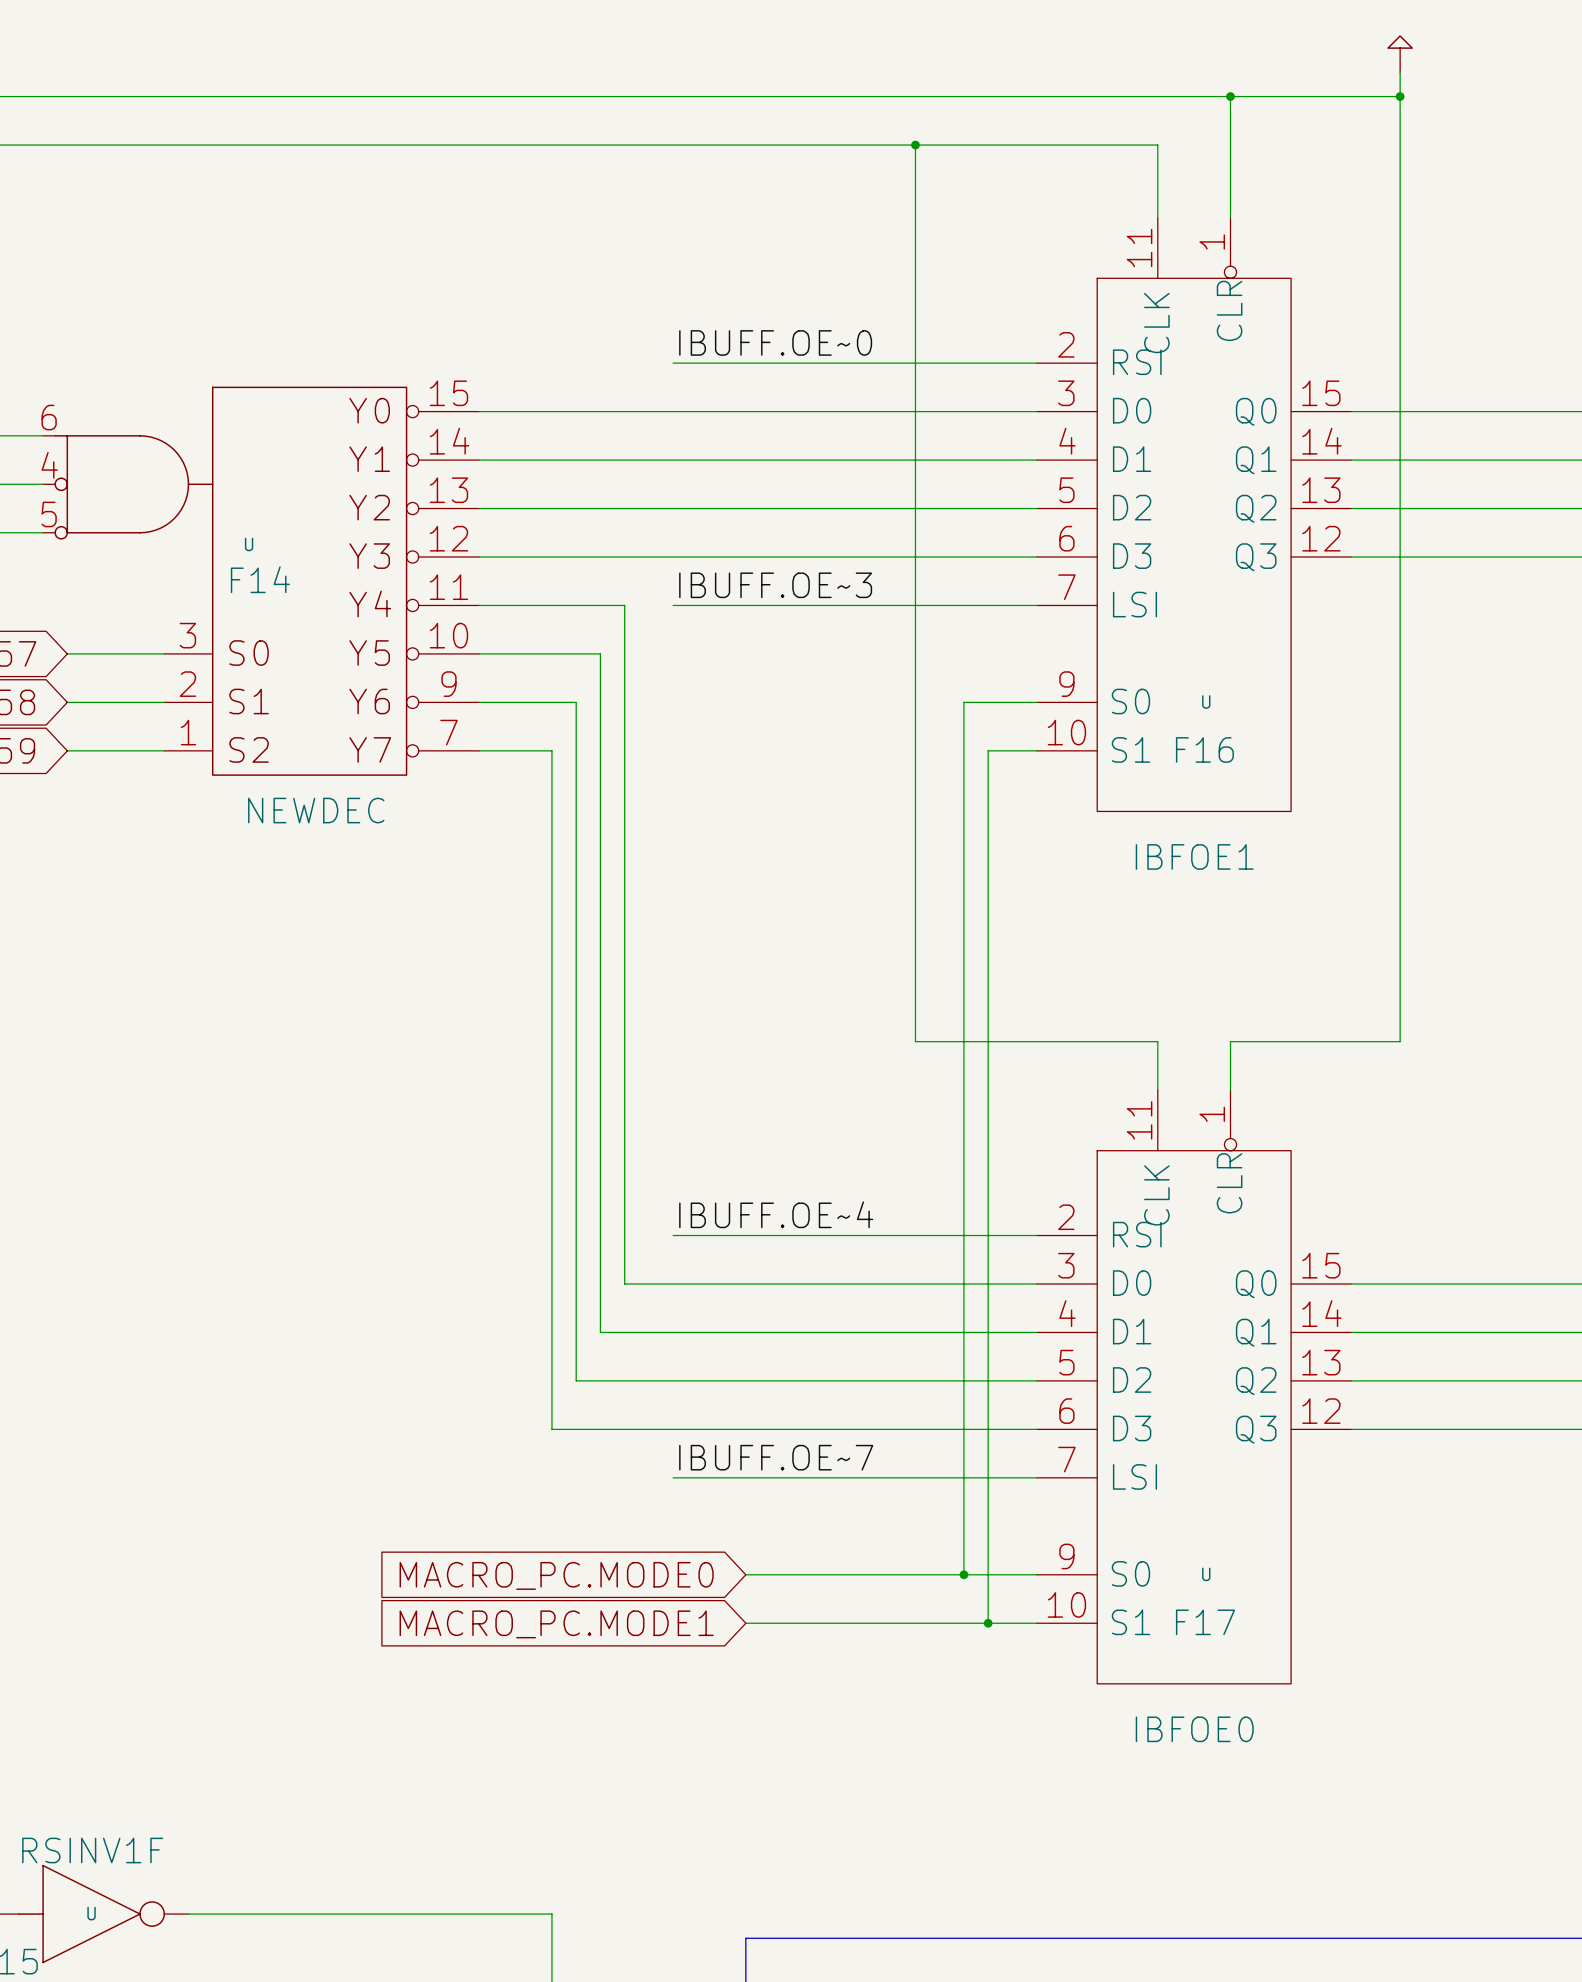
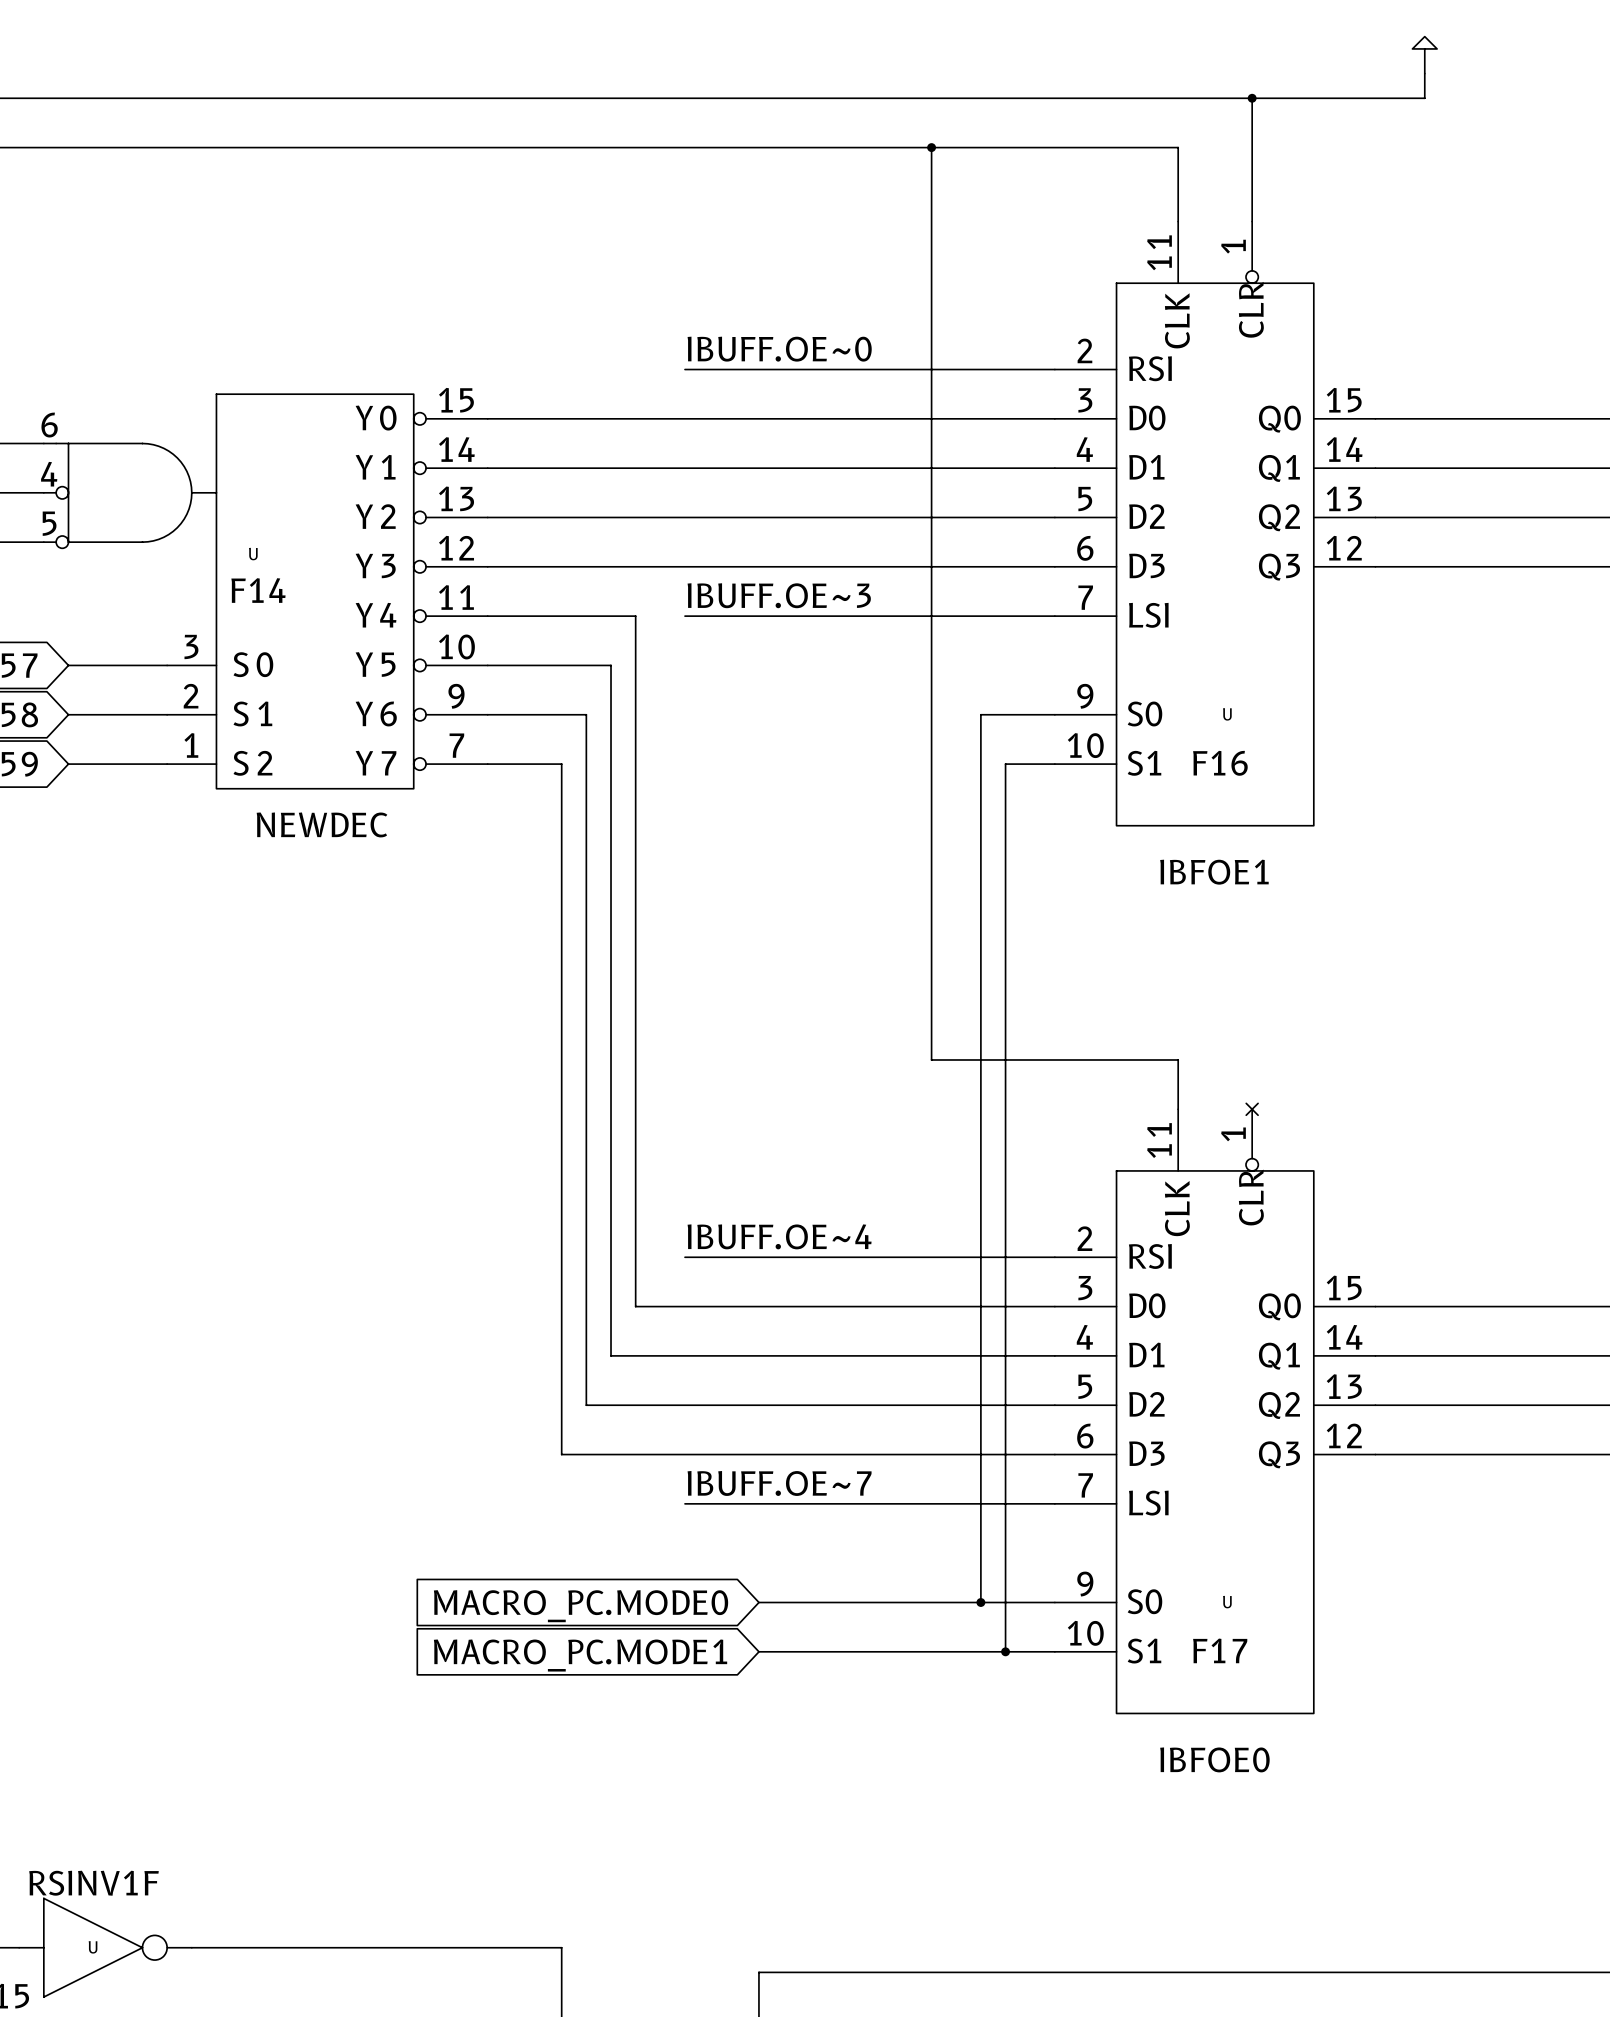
wire: (1400, 96) (1400, 1041) (1230, 1041) (1230, 1090) -> none
junction: (1400, 96) -> none
no-connect mark: none -> (1252, 1109)

